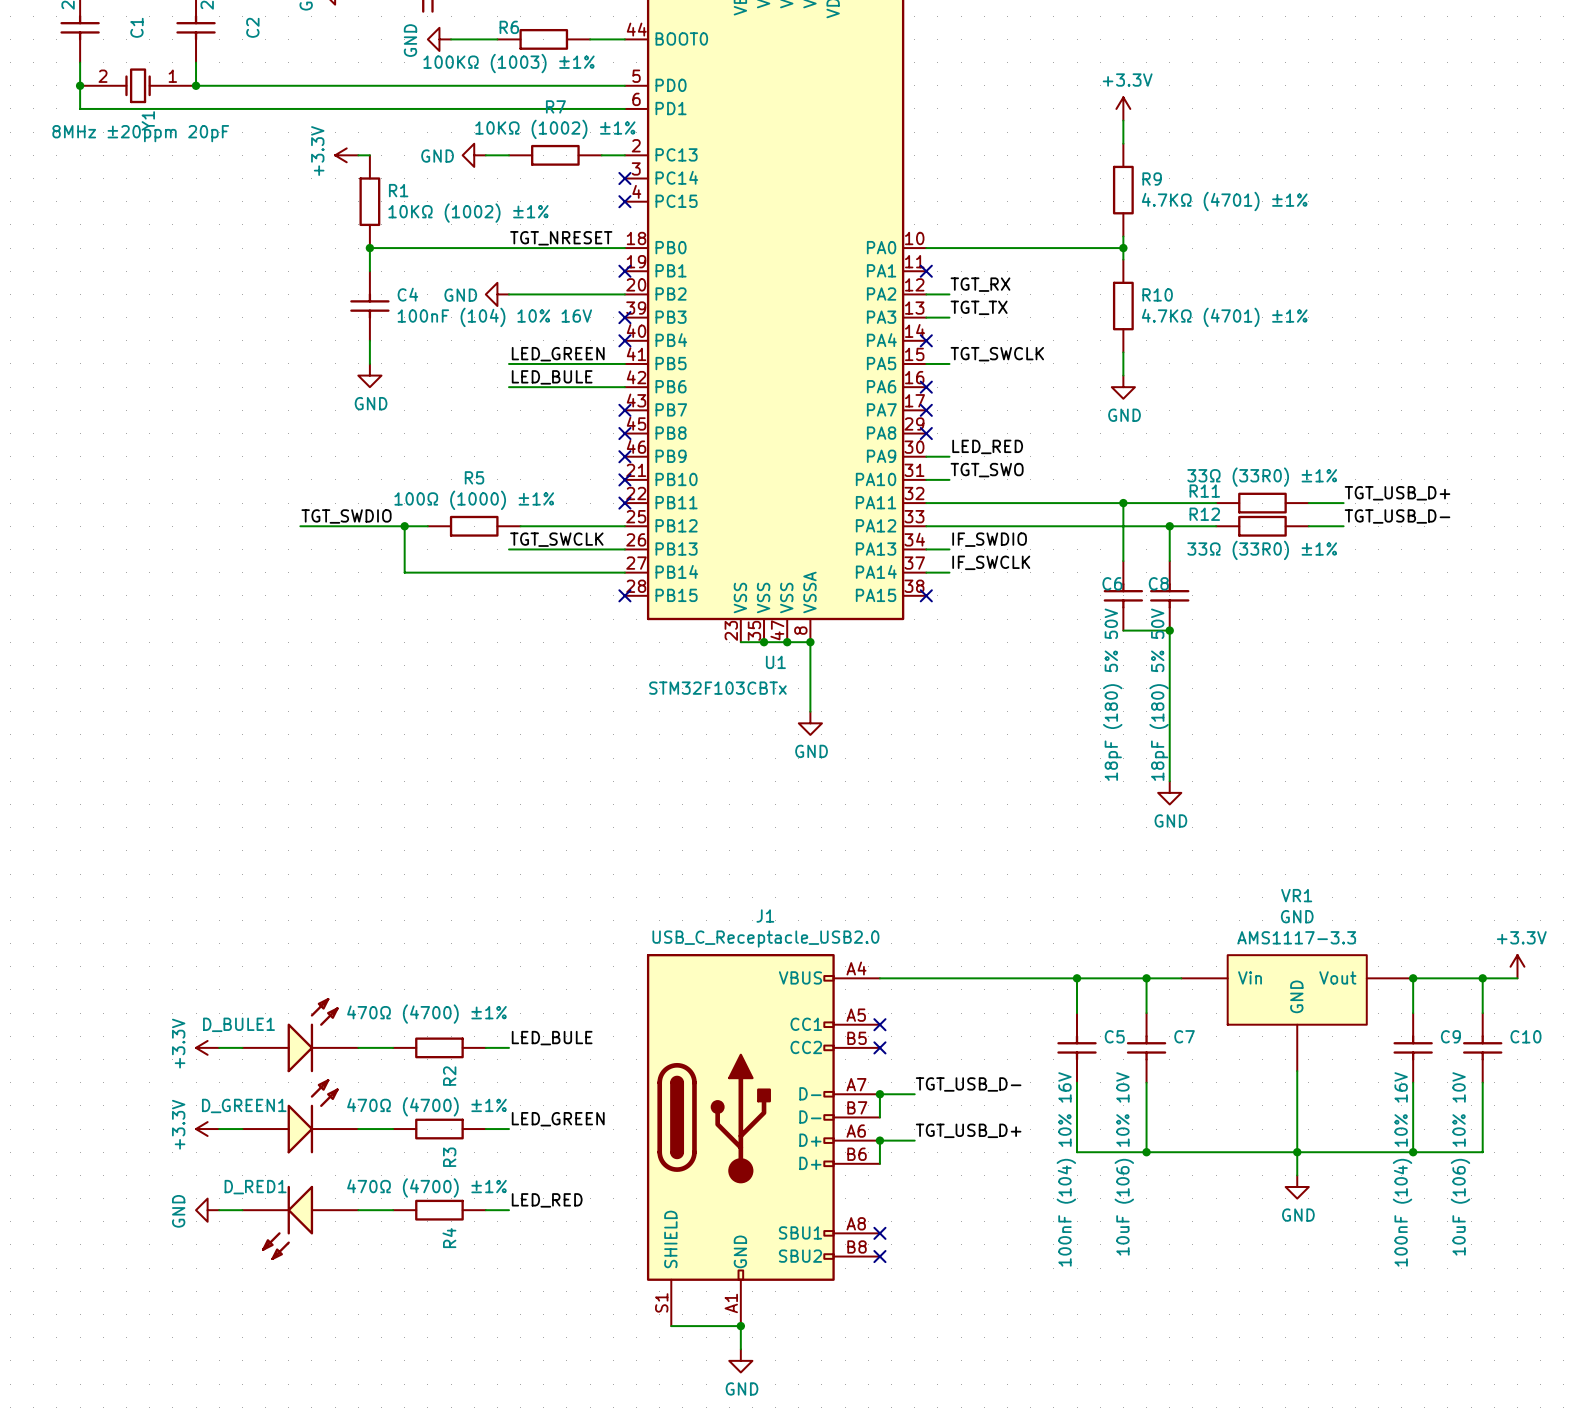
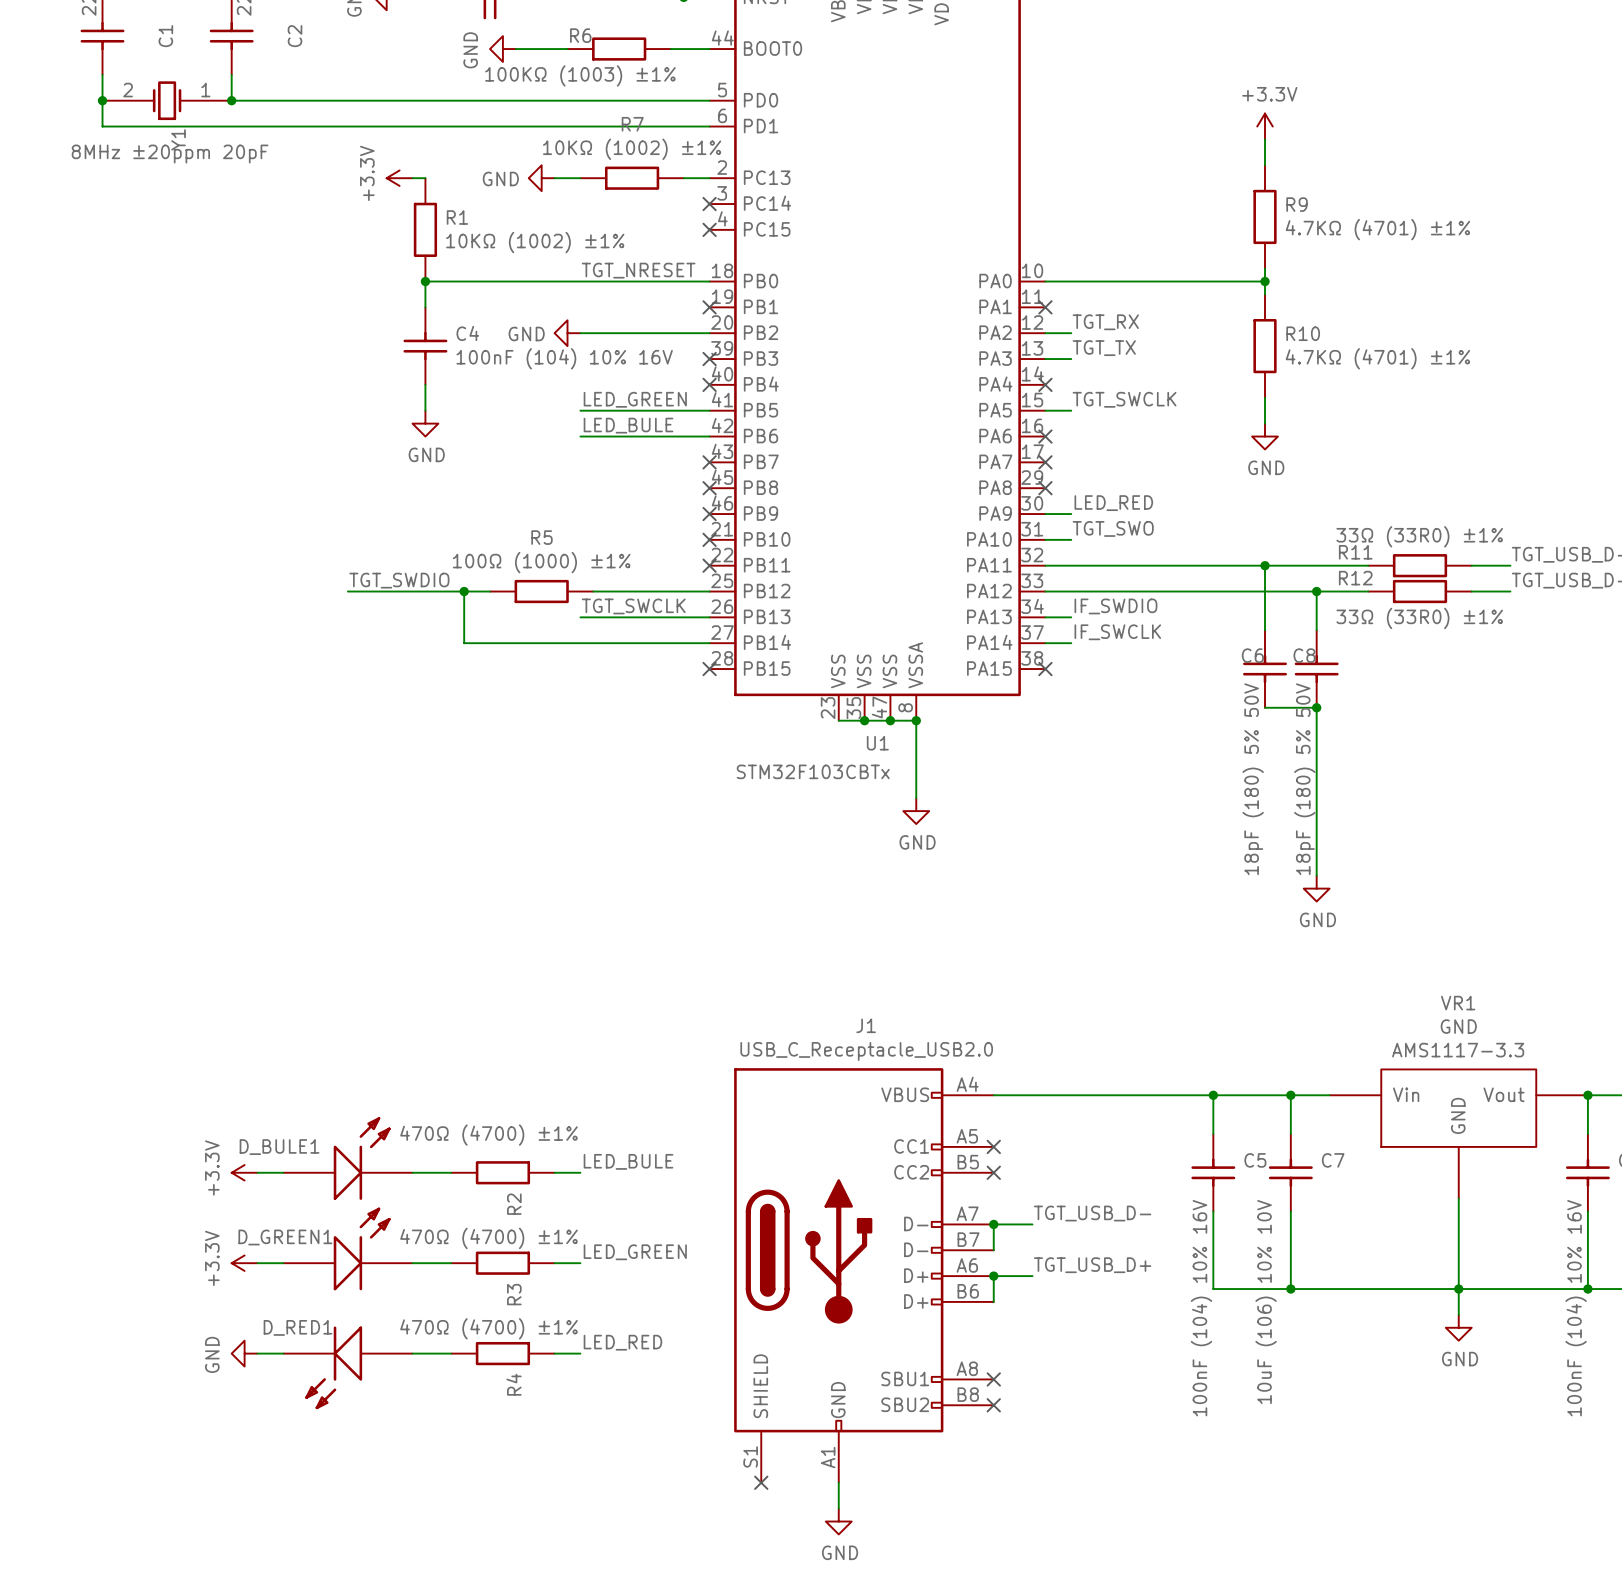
wire: (671, 1326) (740, 1326) -> none
no-connect mark: none -> (761, 1482)
junction: (740, 1326) -> none

